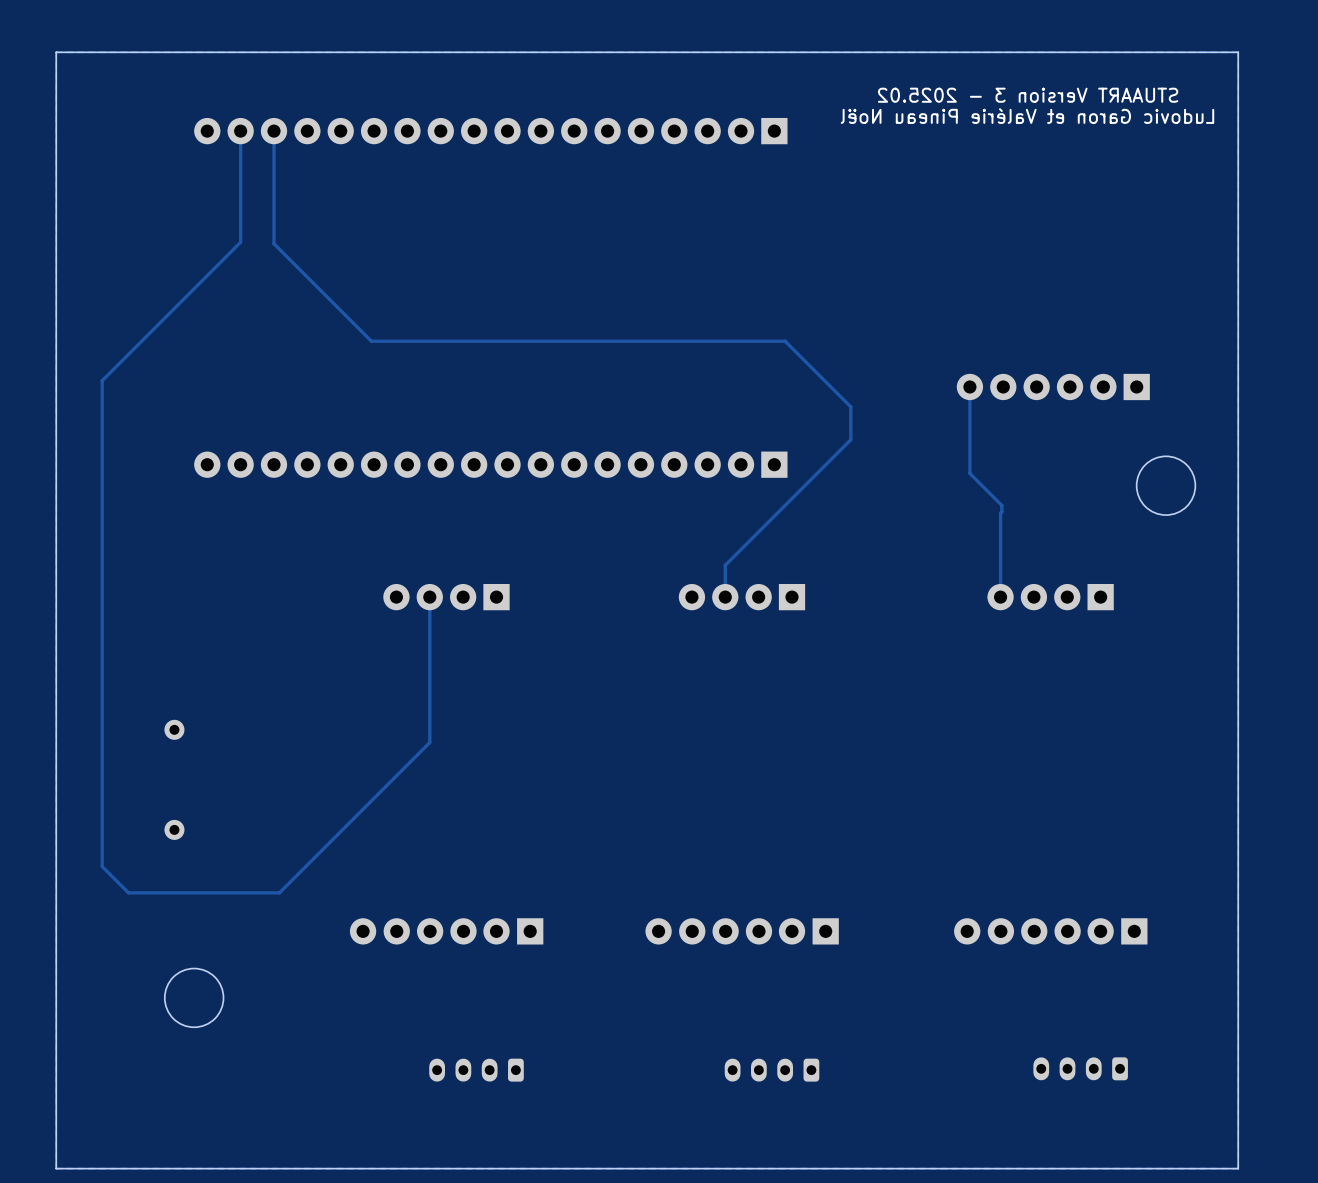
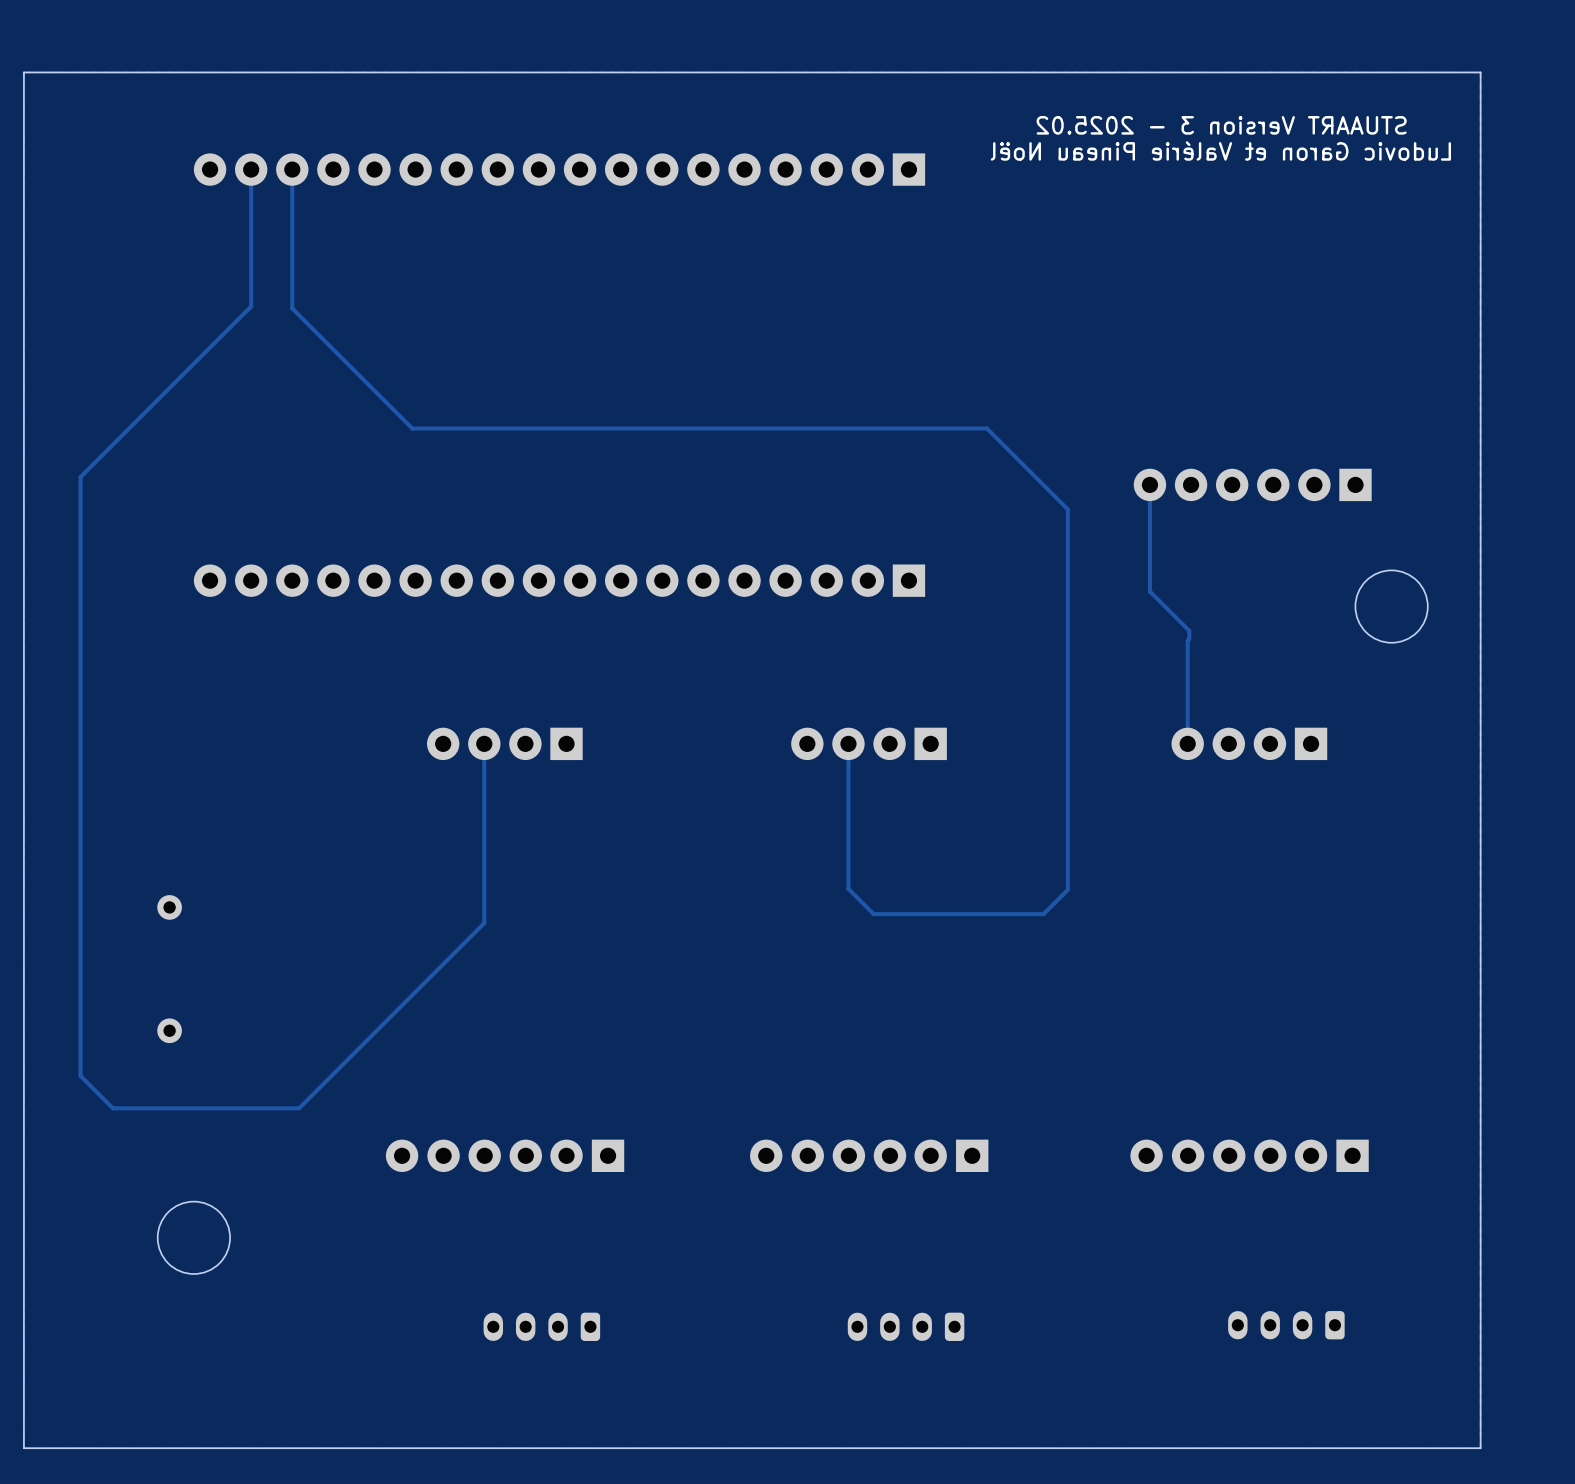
track: (785, 341) (850, 406) (850, 439) (725, 565) (725, 597) -> (922, 428) (986, 428) (1067, 509) (1067, 889) (1043, 914) (873, 914) (848, 888) (848, 743)

